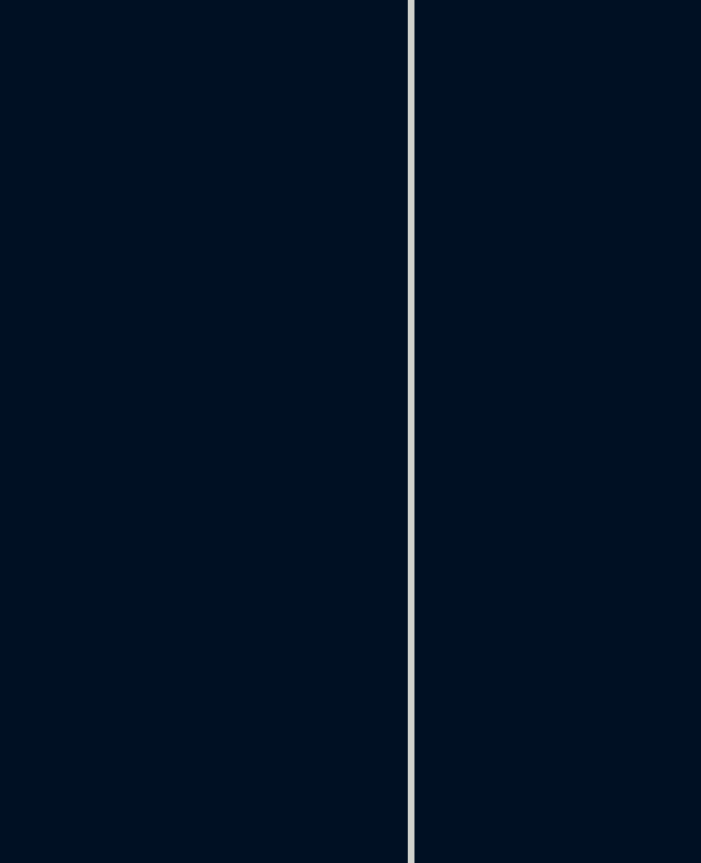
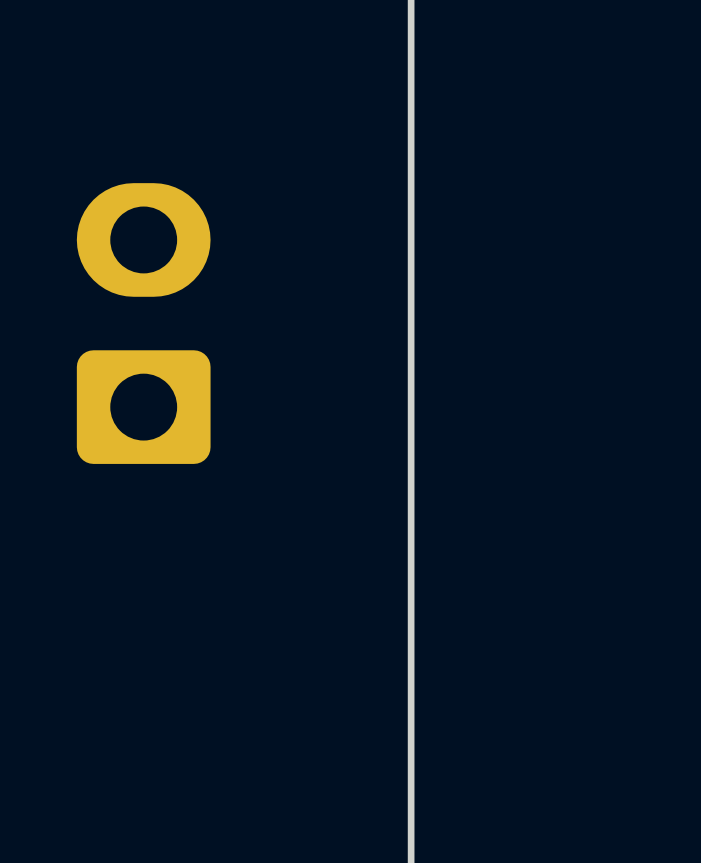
part: none -> (143, 323)

